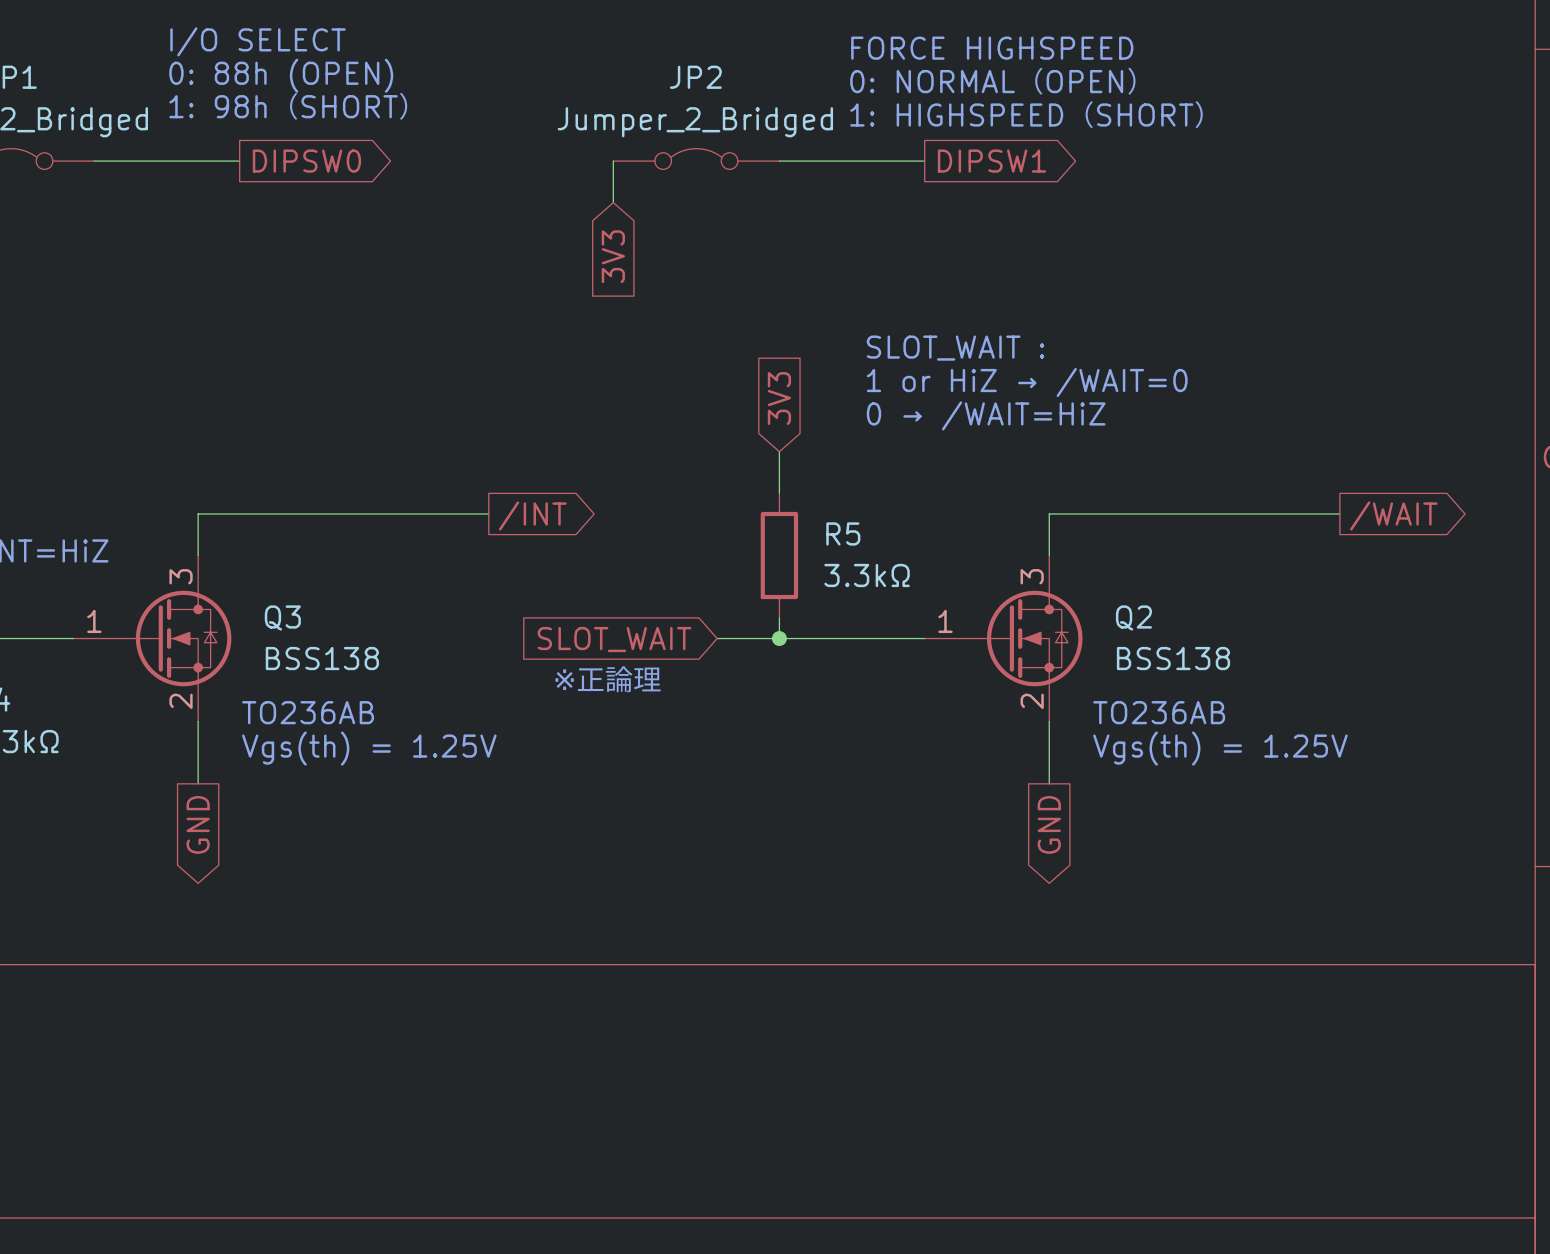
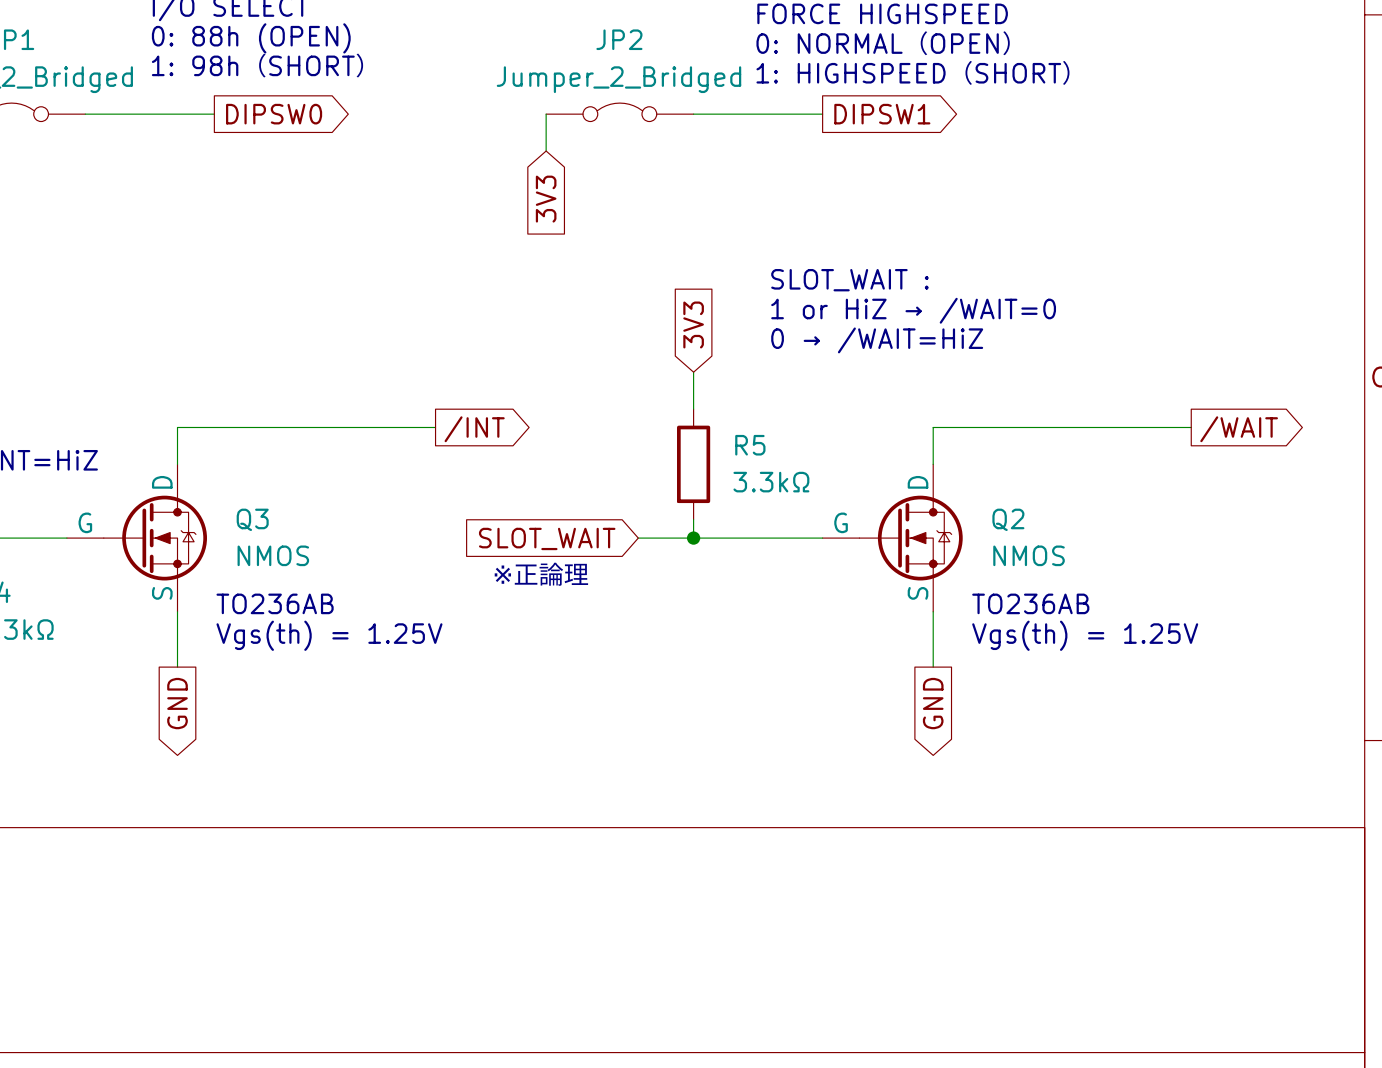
Q3 symbol: [73, 555, 232, 722] -> [66, 464, 207, 612]
Q2 symbol: [924, 555, 1083, 722] -> [822, 464, 963, 612]
Q3 value: BSS138 (322, 658) -> NMOS (273, 555)
Q2 value: BSS138 (1173, 658) -> NMOS (1029, 555)

